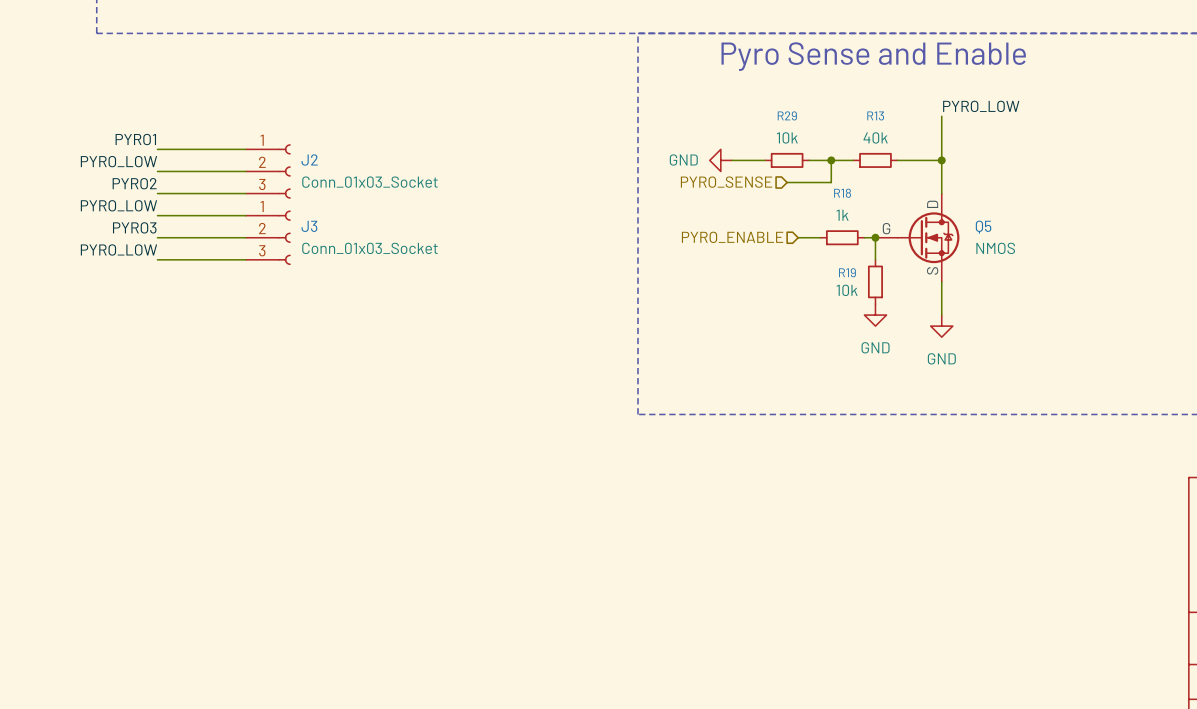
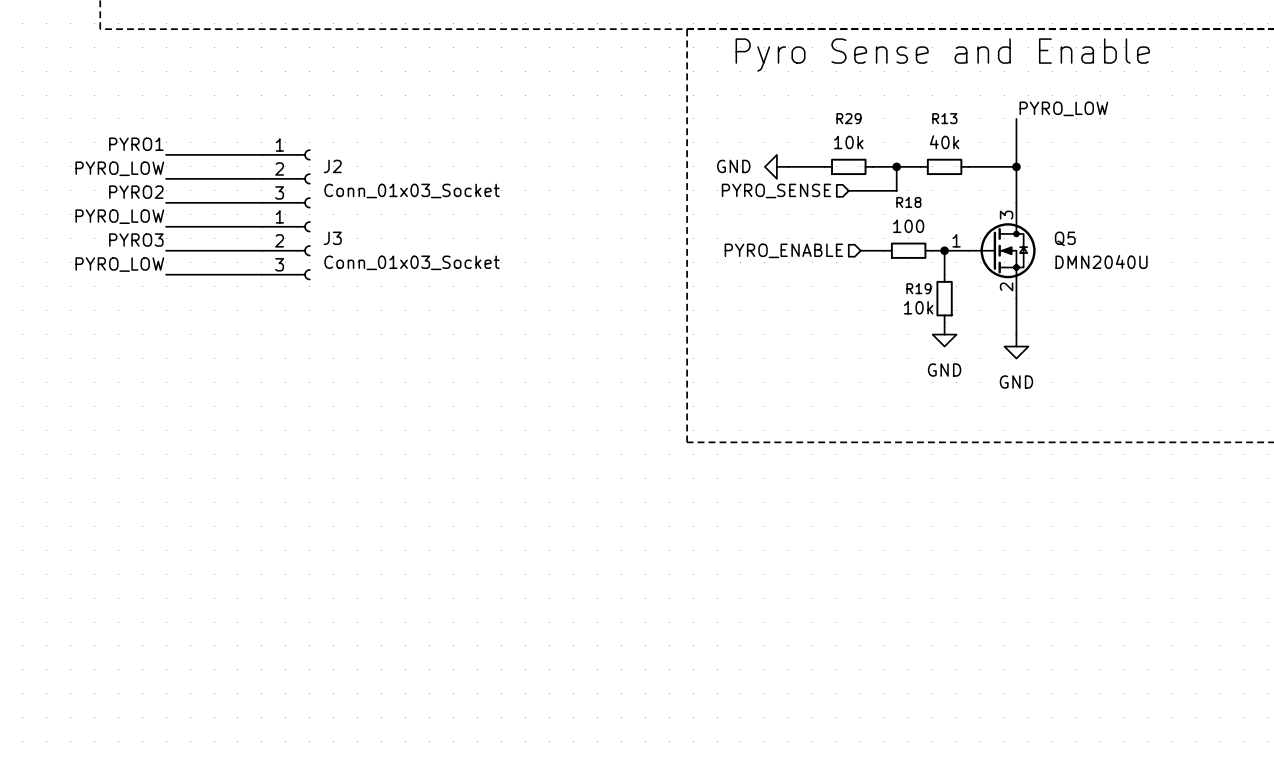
Q5 symbol: [875, 193, 960, 282] -> [944, 202, 1036, 299]
R18 value: 1k (842, 215) -> 100 (908, 226)
Q5 value: NMOS (995, 248) -> DMN2040U (1101, 261)

